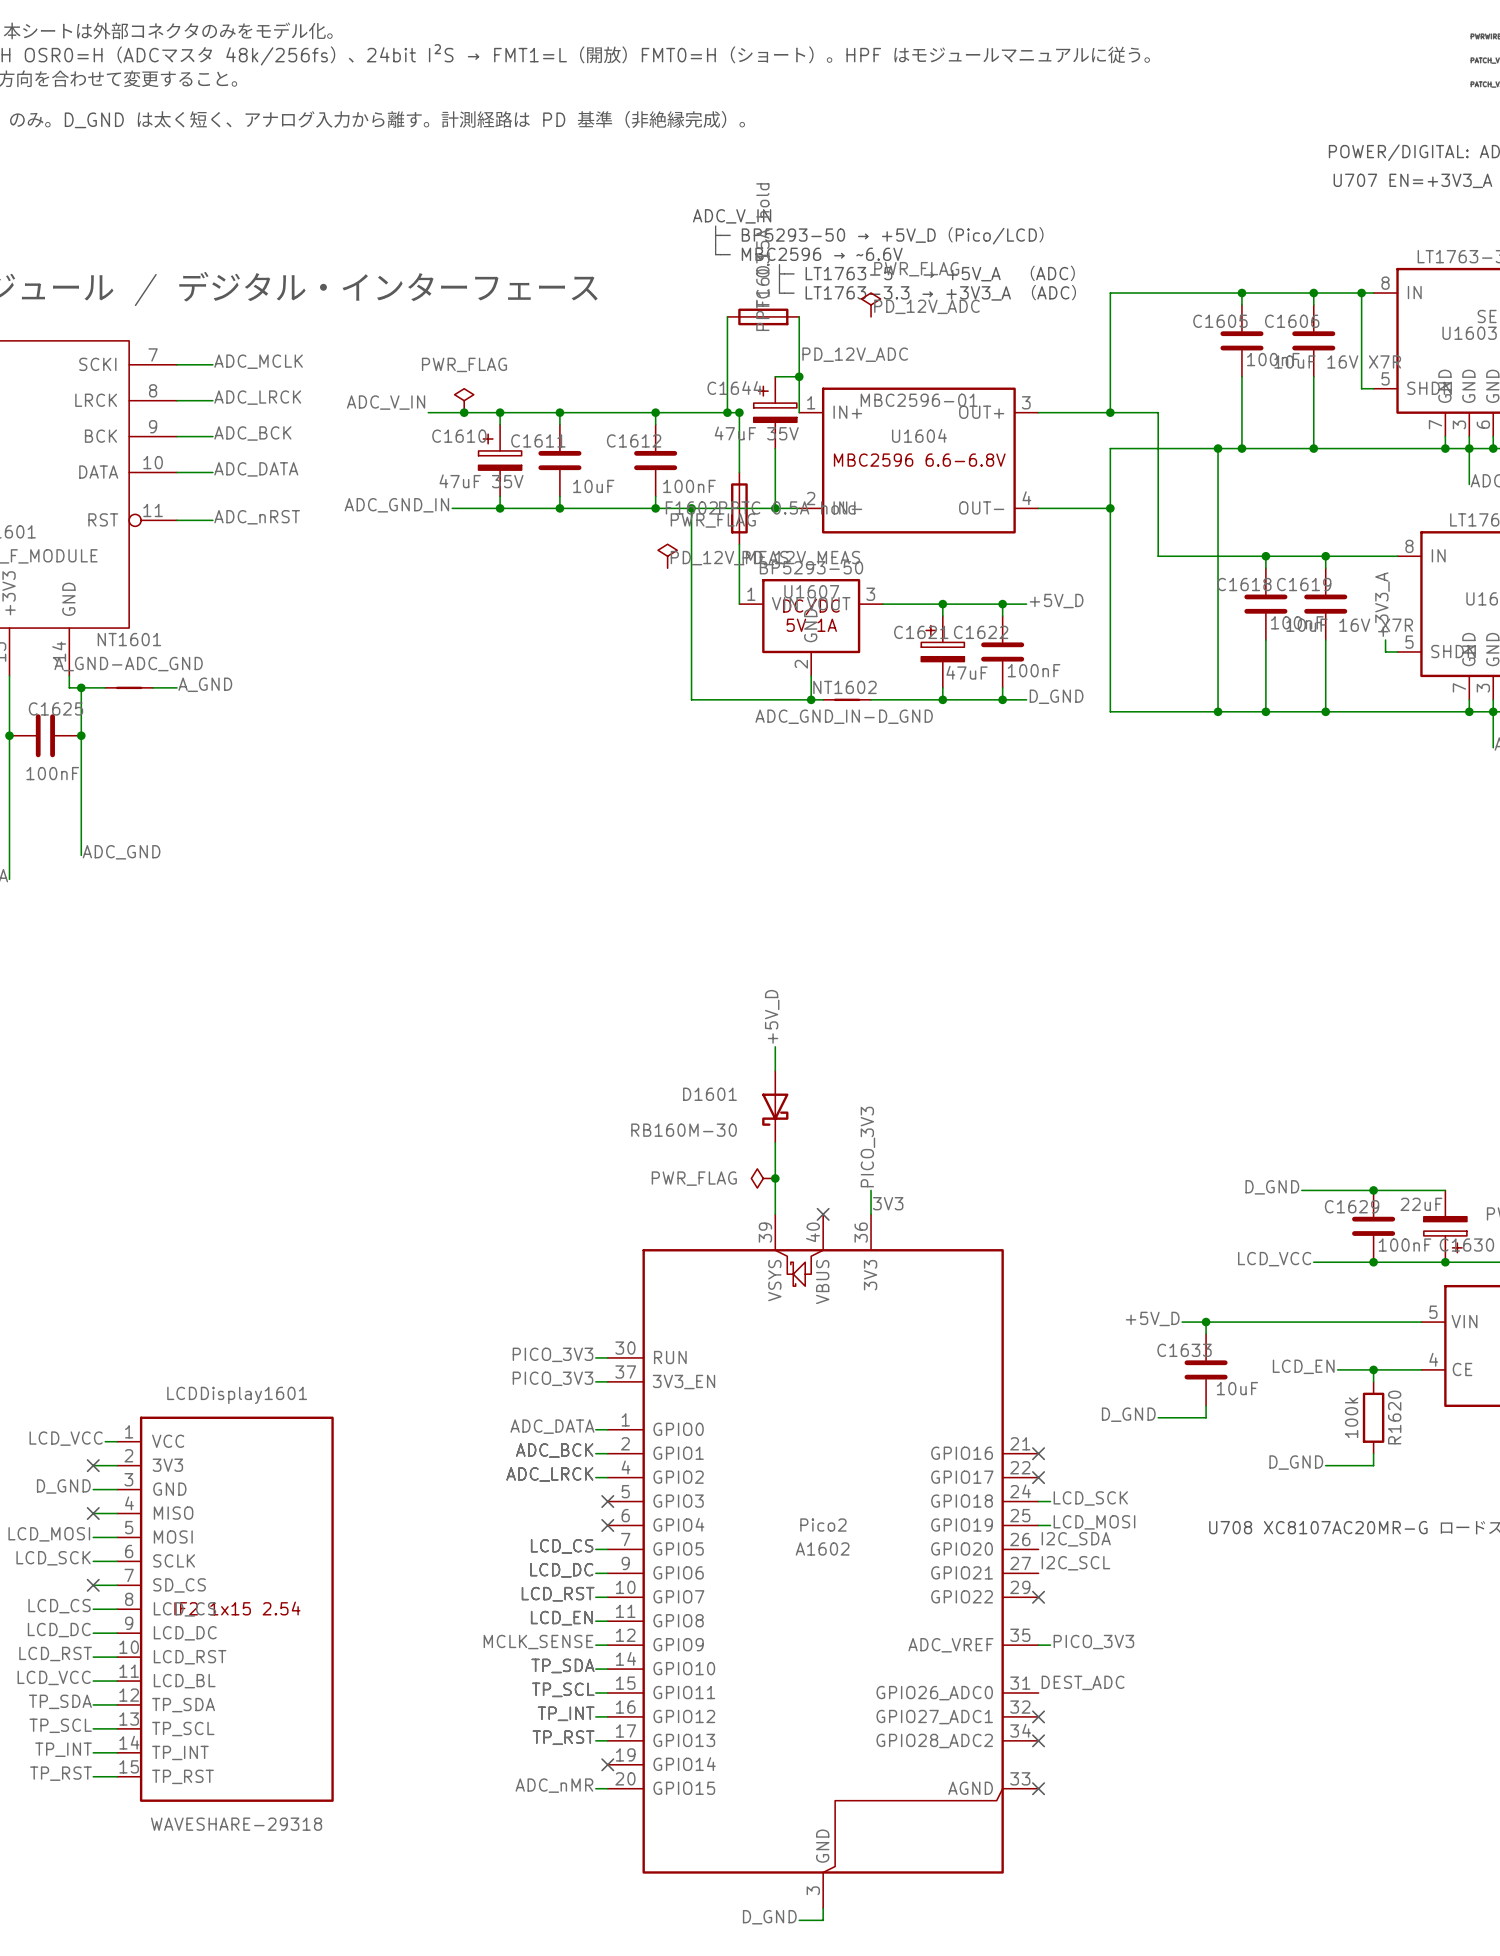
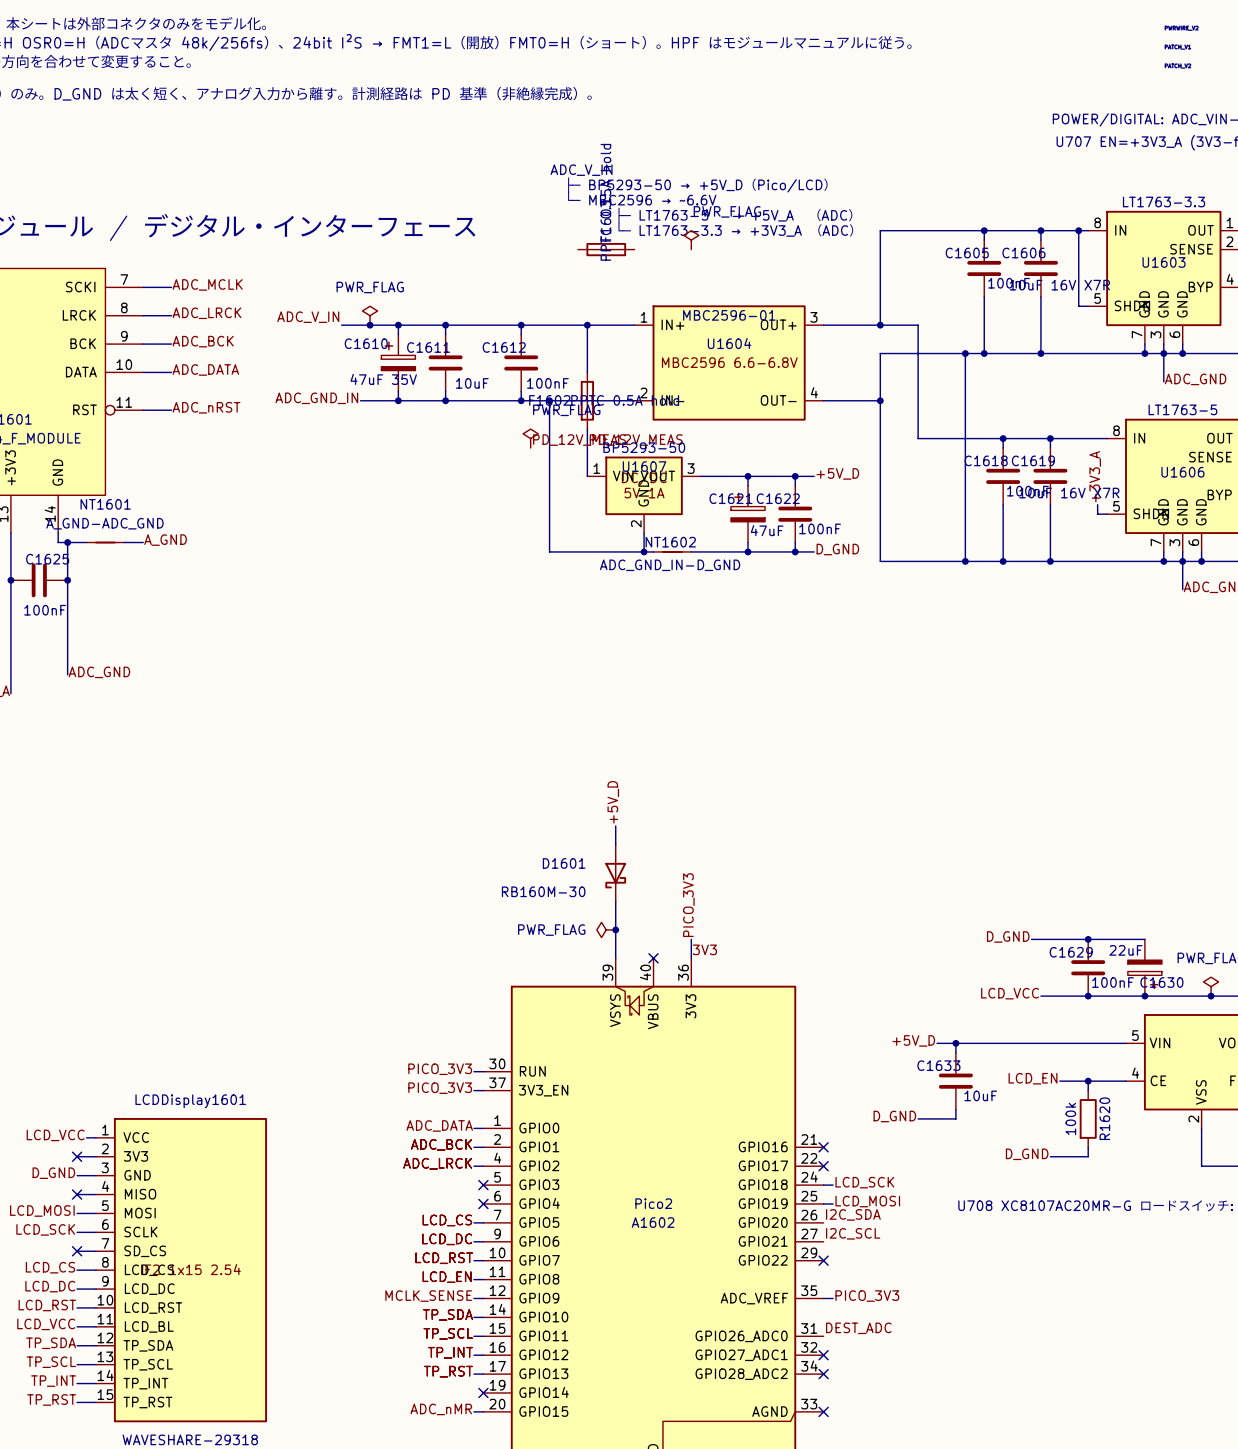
label: PD_12V_ADC (926, 306) -> none
wire: (727, 316) (727, 412) -> none
wire: (799, 316) (799, 412) -> (587, 325) (634, 325)
label: PD_12V_ADC (855, 354) -> none
wire: (775, 376) (799, 376) -> none
junction: (799, 376) -> none
junction: (727, 412) -> none
C1644: 47uF 35V (775, 412) -> none
wire: (775, 448) (775, 508) -> none
junction: (775, 508) -> none

